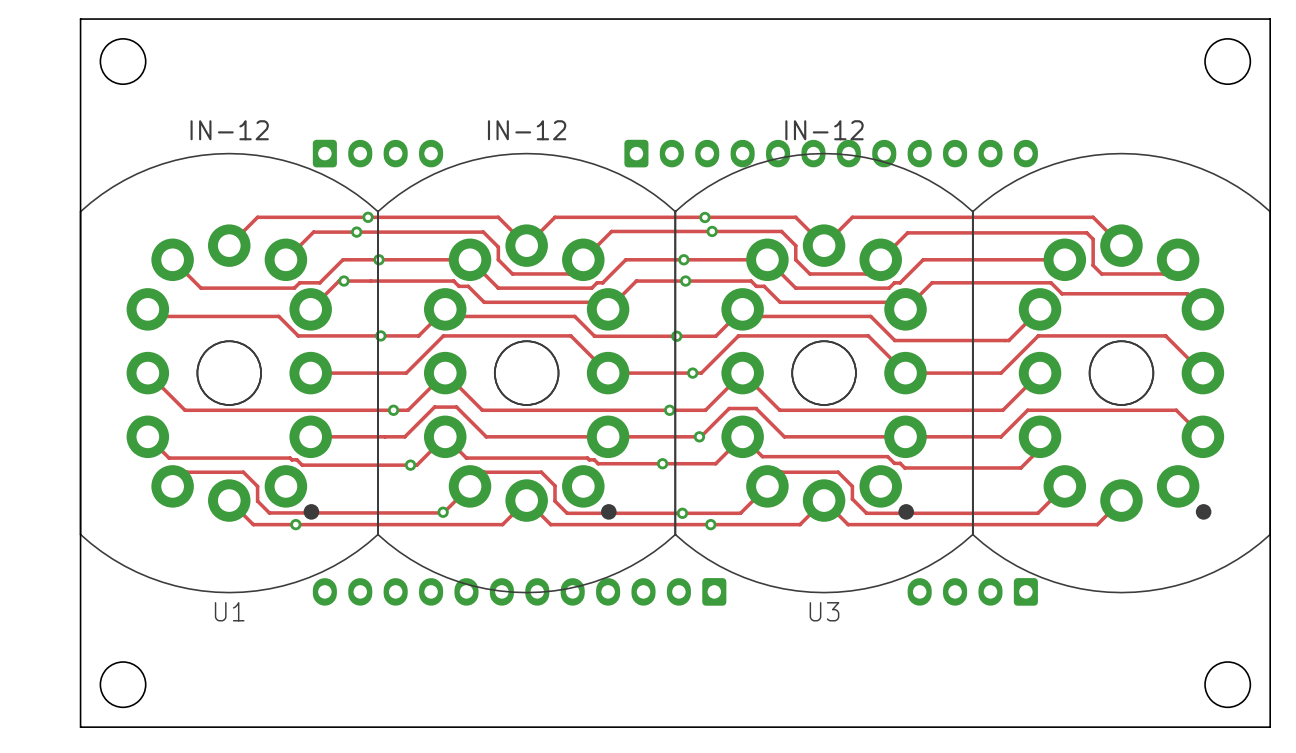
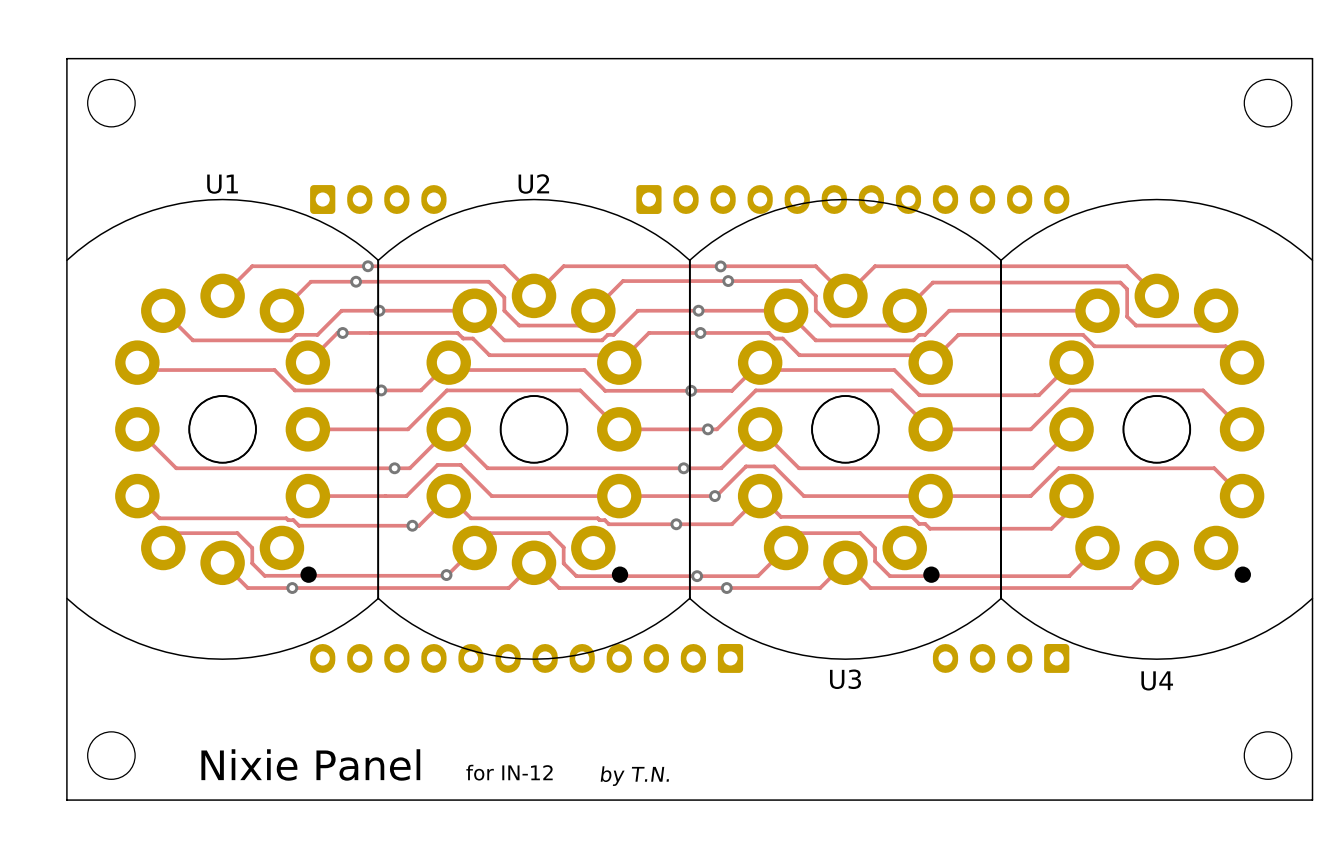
U1 value: IN-12 (229, 130) -> none
U2 value: IN-12 (527, 130) -> none
U3 value: IN-12 (824, 130) -> none
U2 name: none -> U2 (533, 183)
U1 footprint: [79, 152, 379, 594] -> [66, 198, 380, 660]
part: (1121, 373) -> none
U4: none -> (1156, 429)
U1 name position: U1 (229, 611) -> U1 (222, 184)
text: none -> Nixie Panel (310, 764)
text: none -> for IN-12 (509, 772)
text: none -> by T.N. (634, 776)

